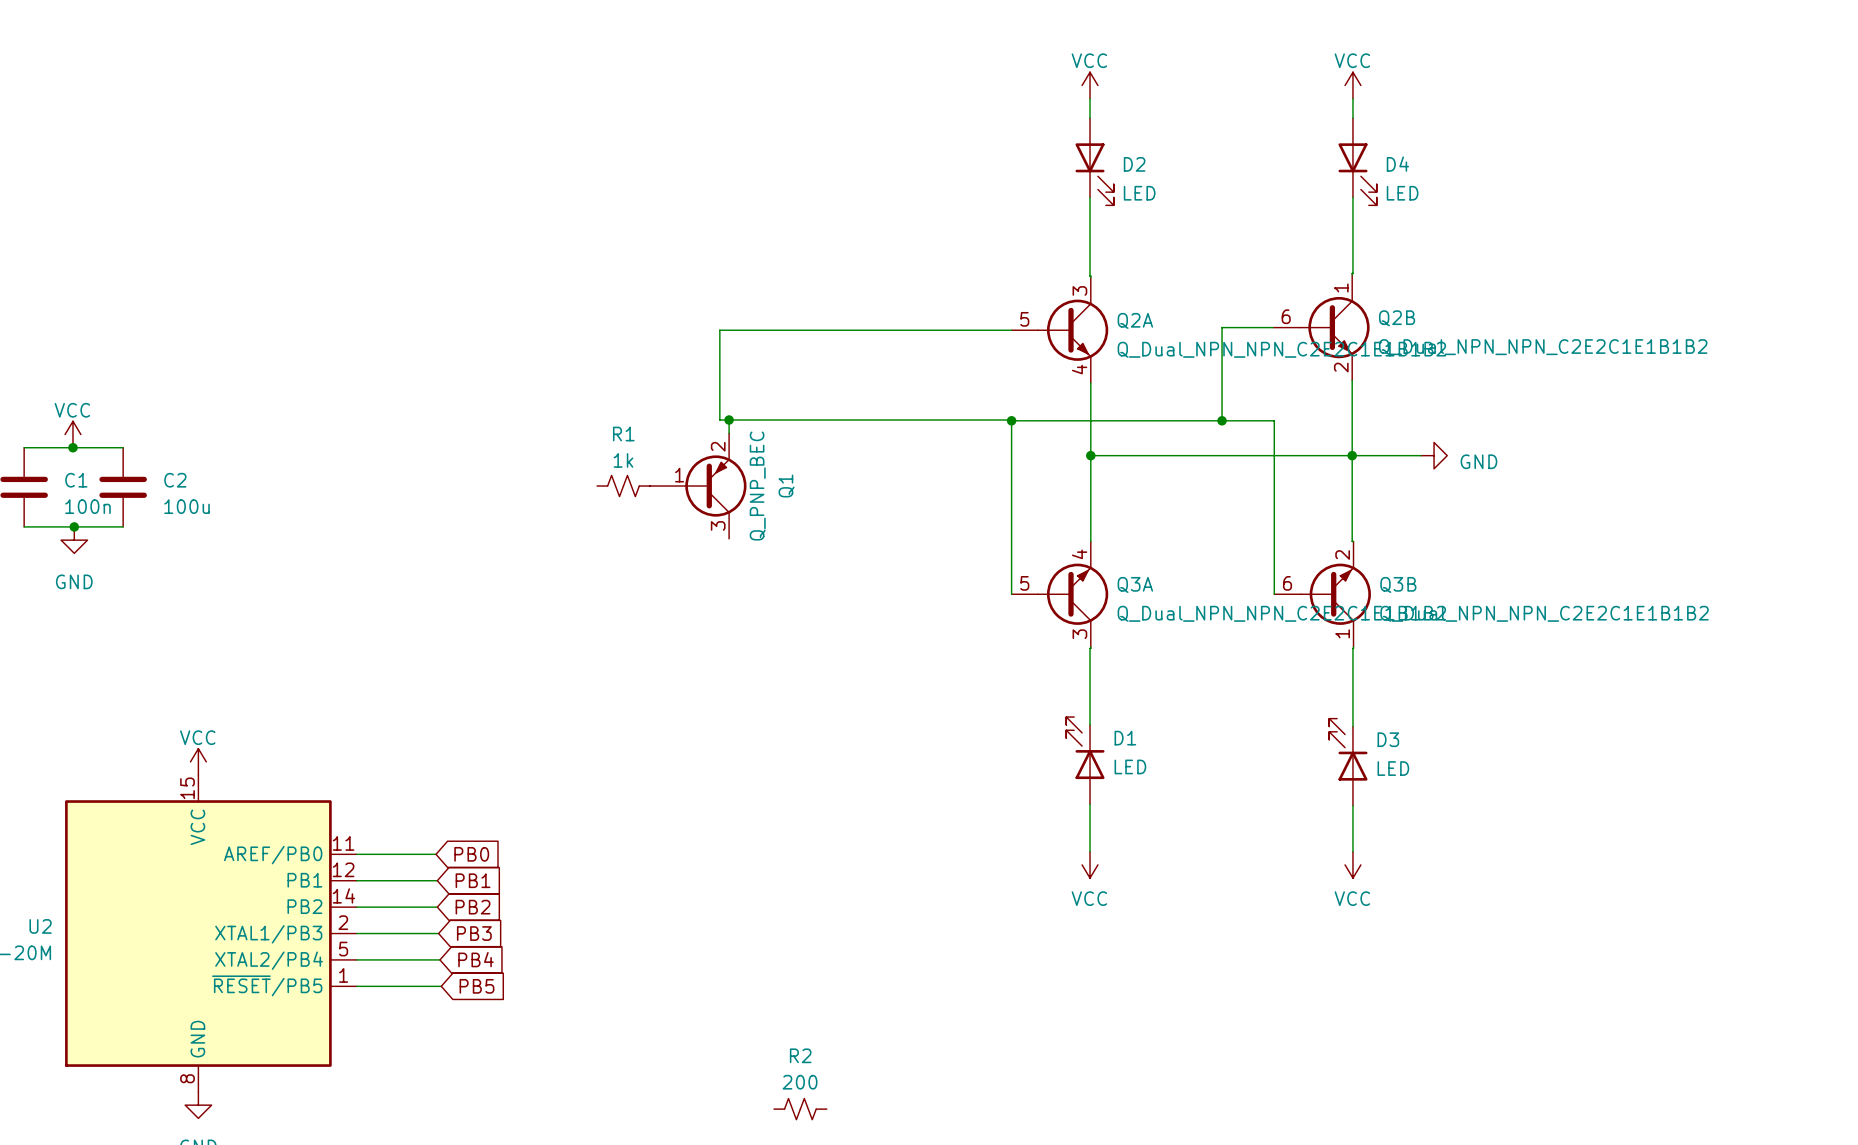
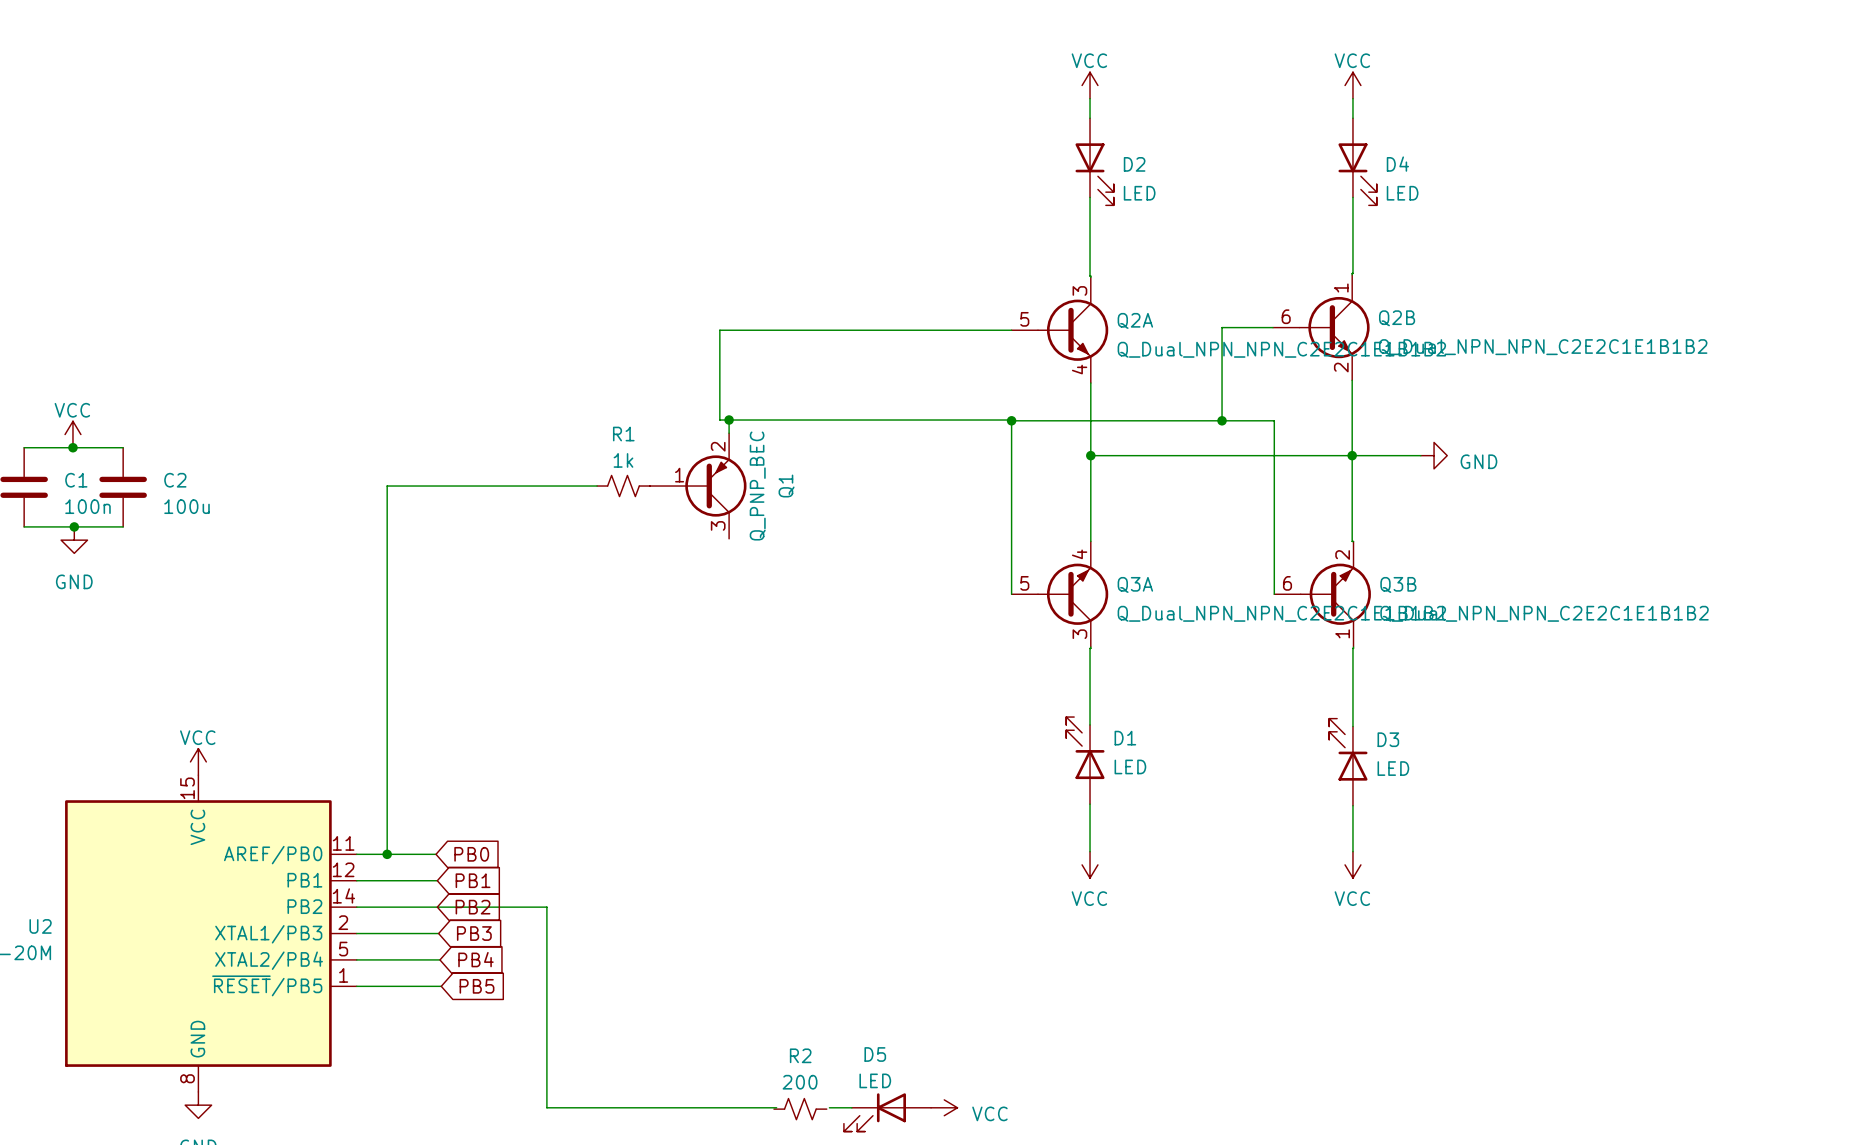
wire: none -> (597, 486) (387, 486) (387, 854)
junction: none -> (387, 854)
wire: none -> (437, 907) (546, 907) (546, 1107) (776, 1107)
wire: none -> (829, 1107) (851, 1107)
power symbol: none -> VCC (944, 1107)
D5: none -> LED (887, 1112)

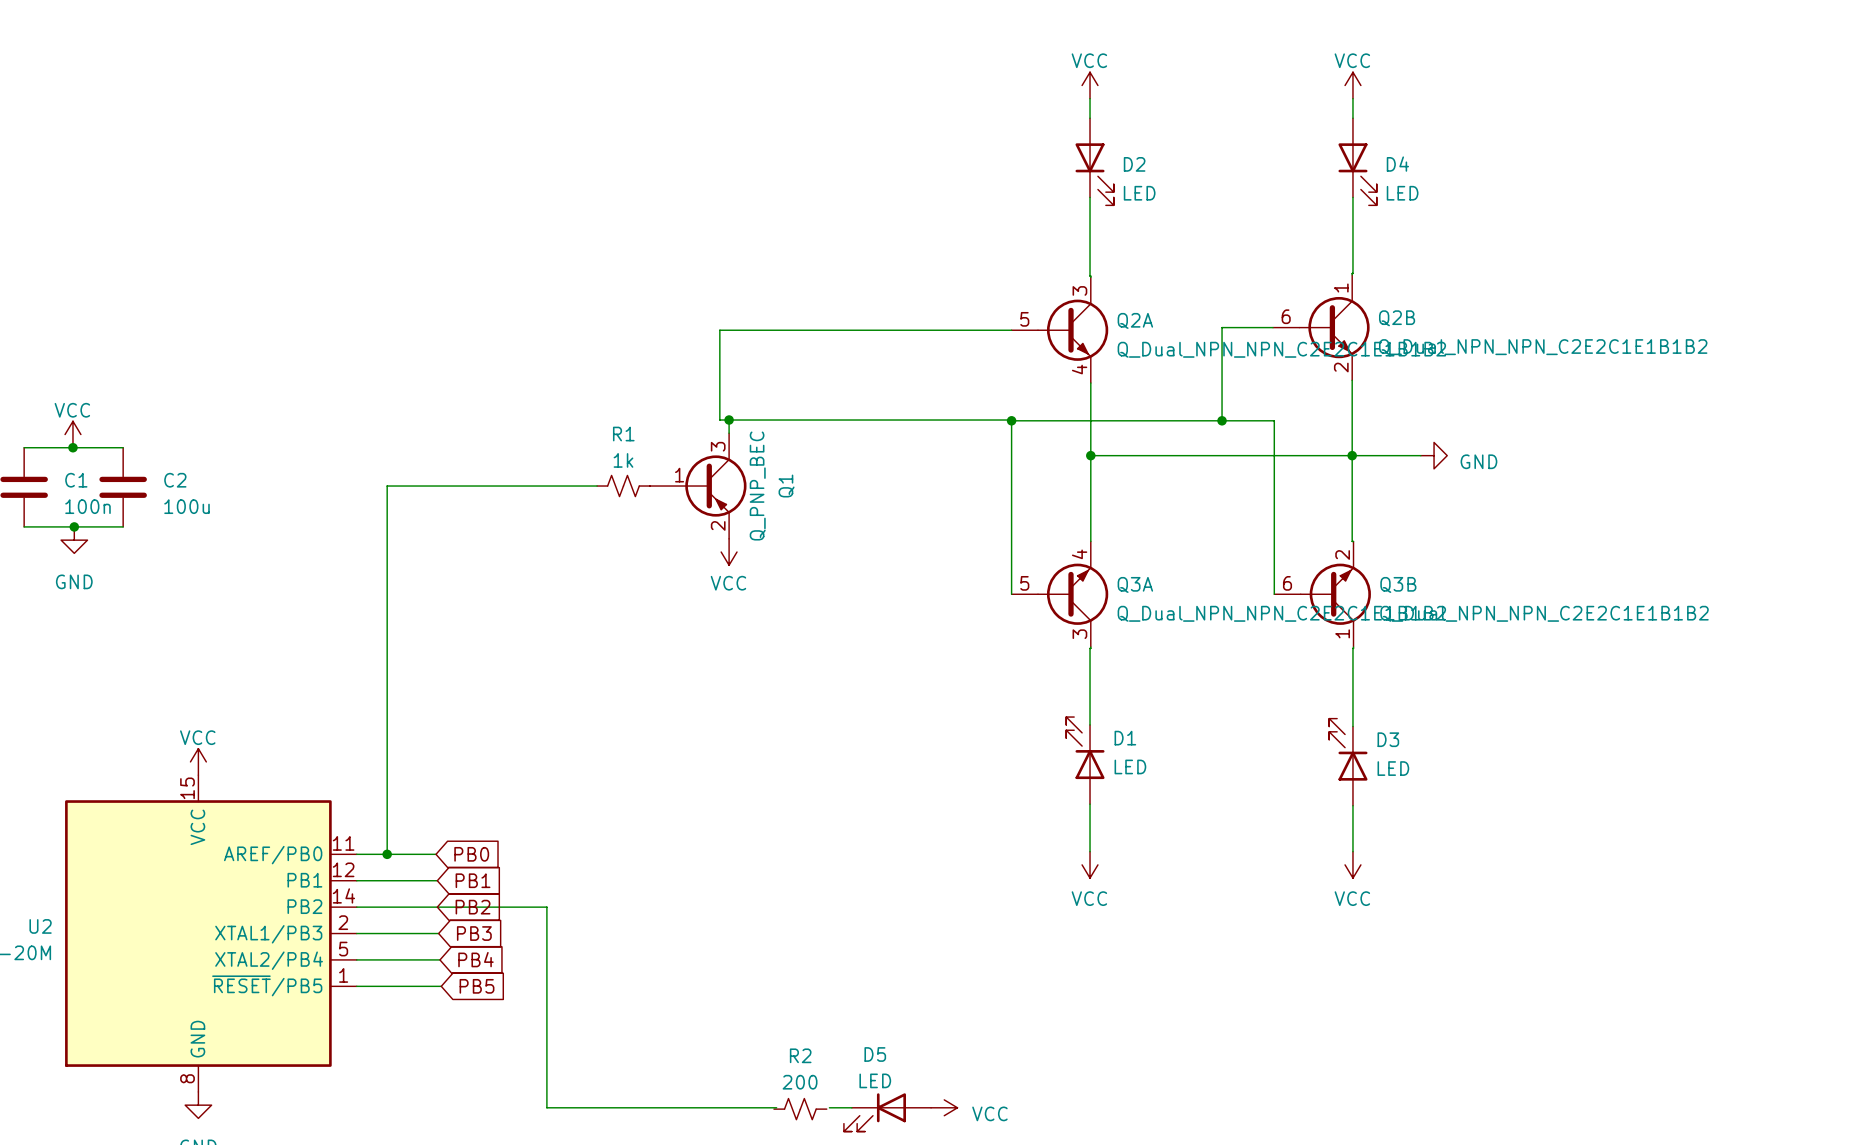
Q1 flip: as is (715, 486) -> up-down (715, 486)
power symbol: none -> VCC (729, 552)

